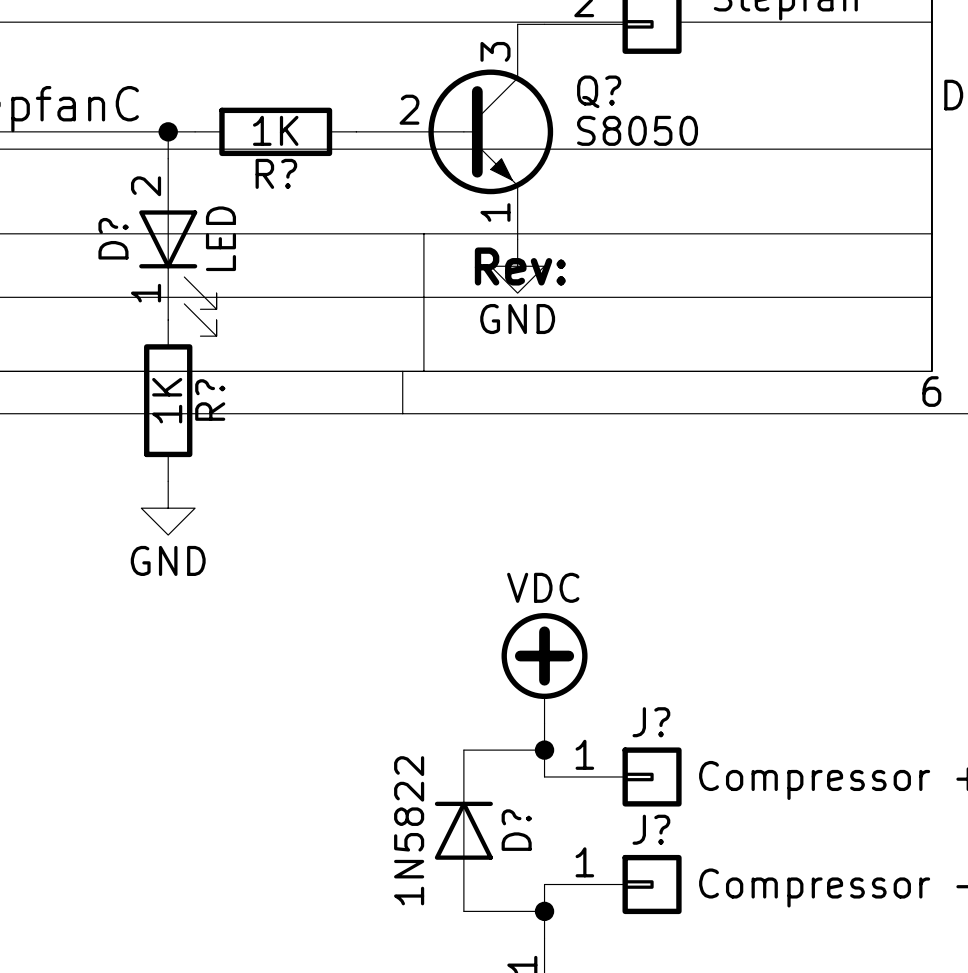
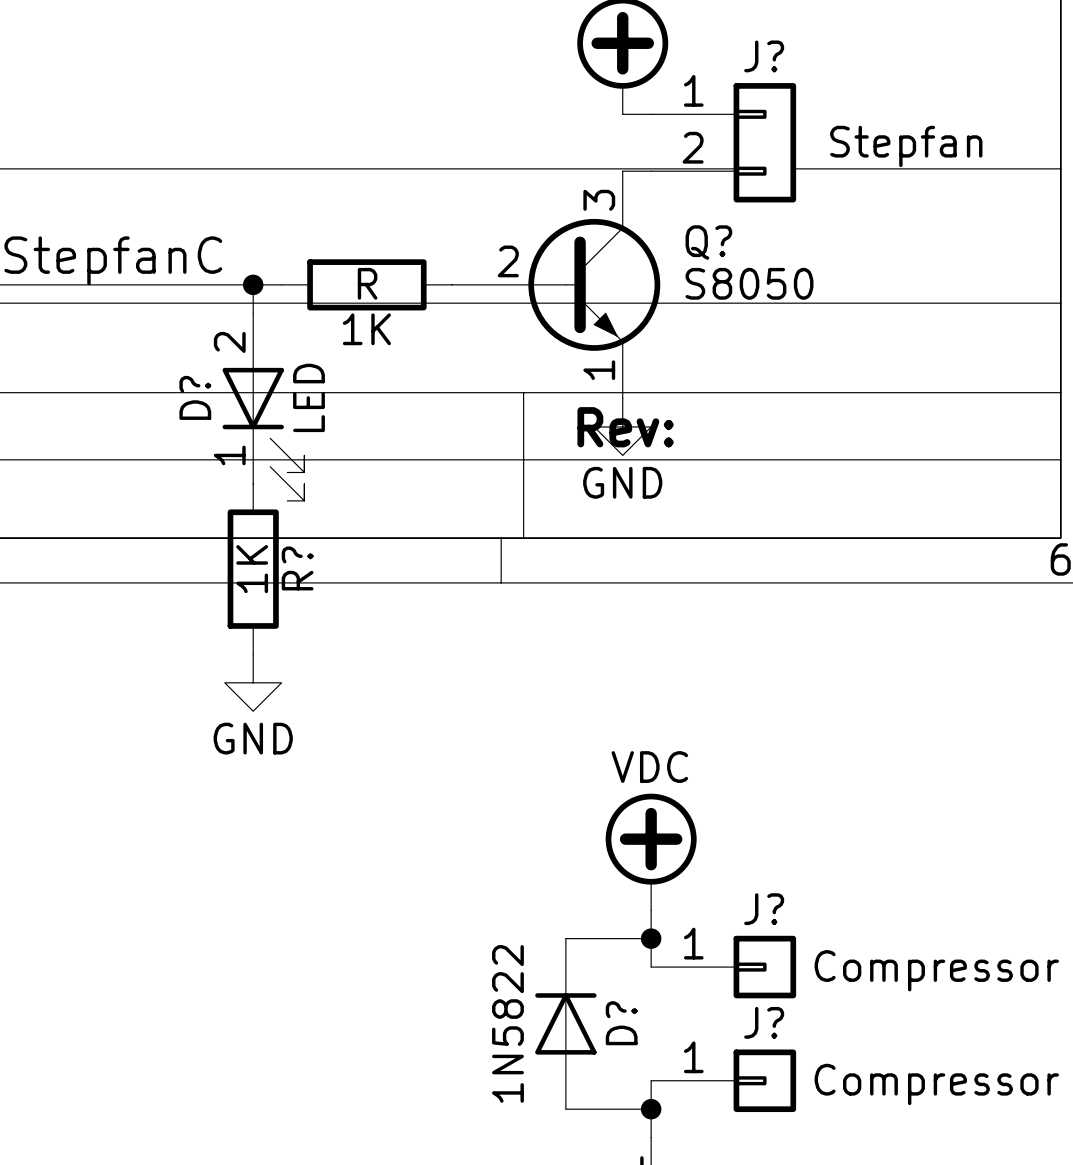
R? value: 1K (275, 130) -> R (367, 283)
R? name: R? (276, 173) -> 1K (366, 329)

